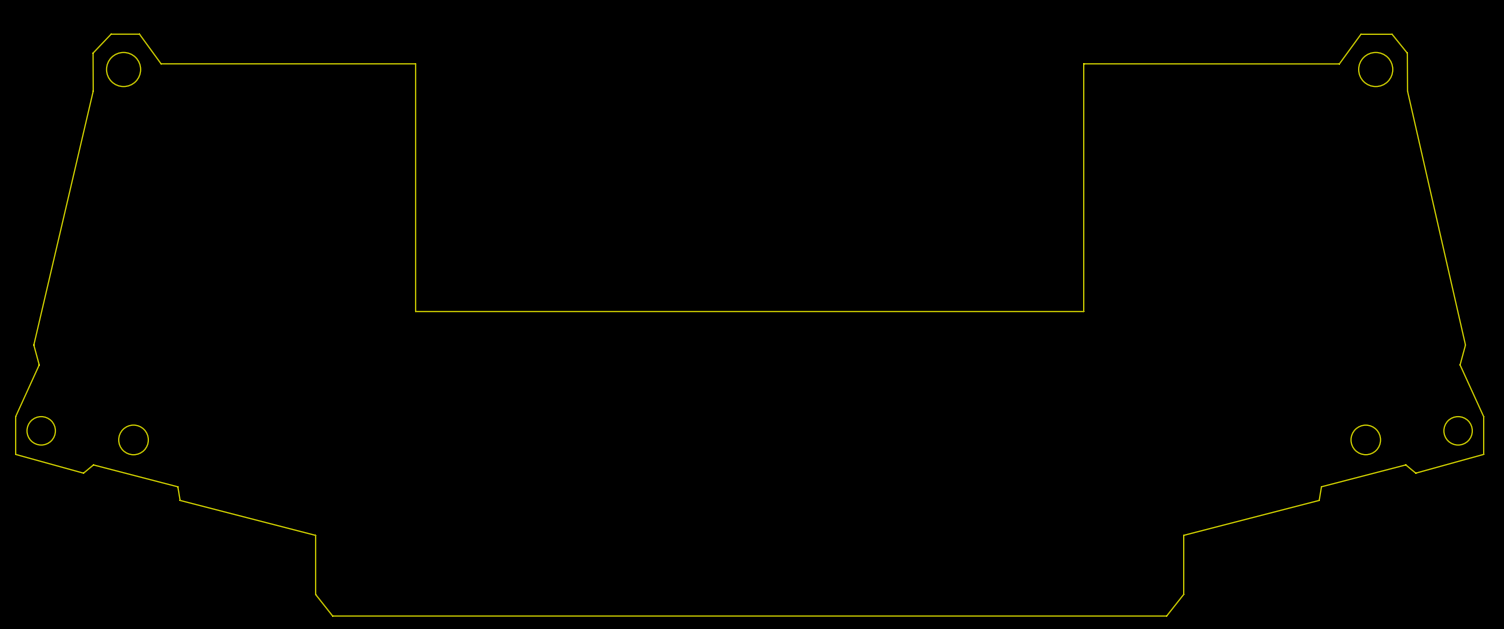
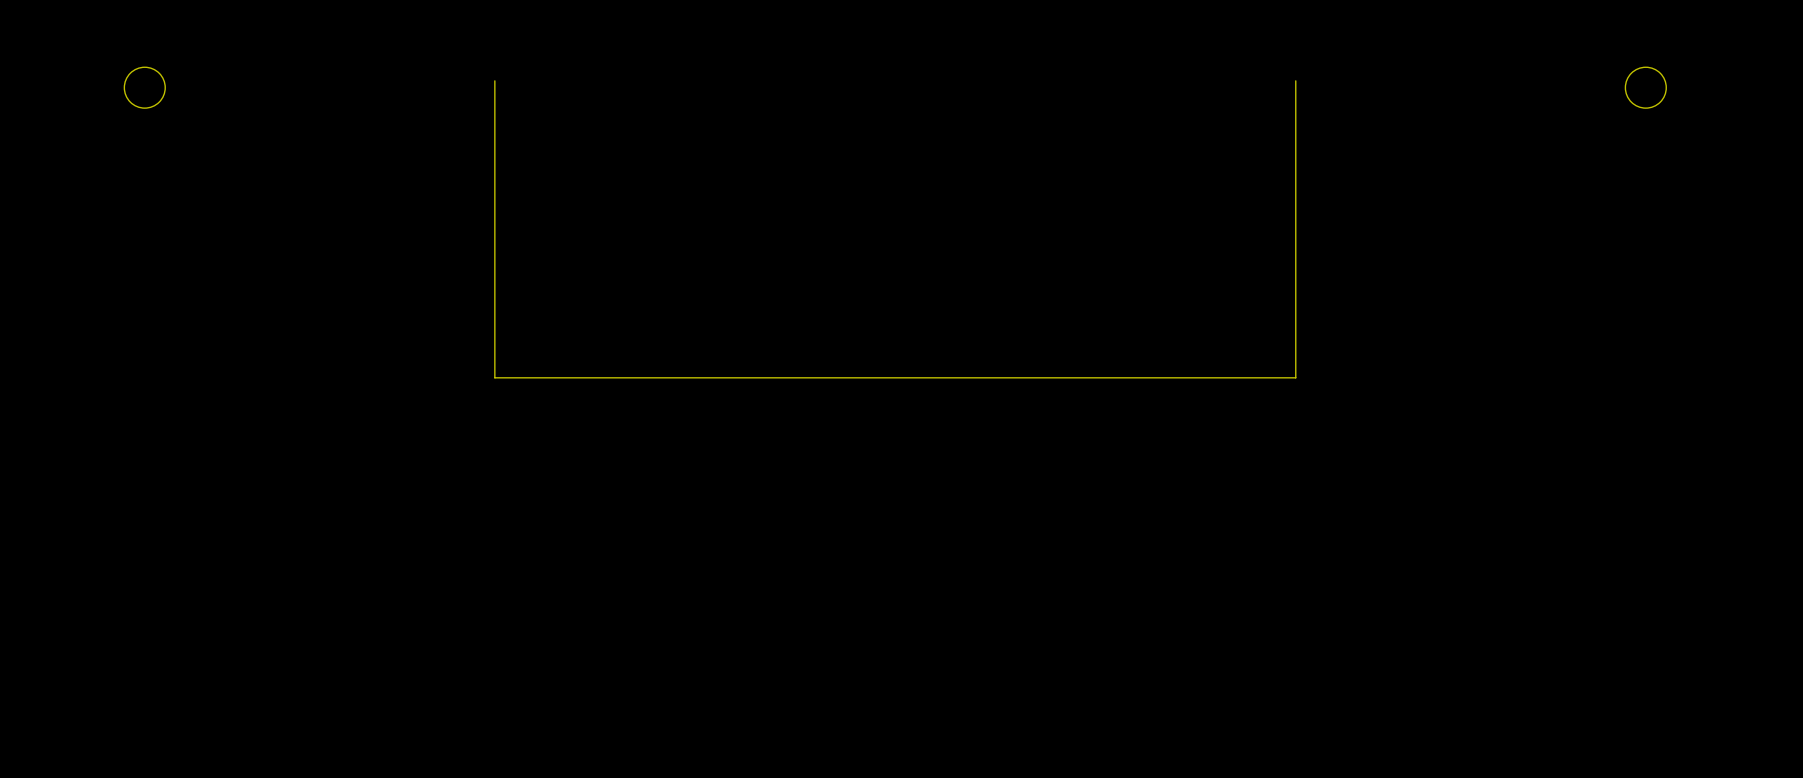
board edge: (415, 63) (161, 63) (139, 34) (111, 34) (93, 53) (93, 91) (33, 345) (39, 364) (15, 416) (15, 454) (83, 473) (93, 464) (177, 486) (180, 500) (315, 535) (315, 594) (332, 616) (1166, 616) (1183, 594) (1183, 535) (1319, 500) (1321, 486) (1405, 464) (1415, 473) (1483, 454) (1483, 416) (1460, 364) (1465, 345) (1407, 91) (1407, 53) (1392, 34) (1360, 34) (1339, 63) (1083, 63) -> none
round board edge: [26, 416, 56, 446] -> none
round board edge: [1443, 416, 1473, 446] -> none
round board edge: [118, 424, 149, 456] -> none
round board edge: [1350, 424, 1382, 456] -> none

